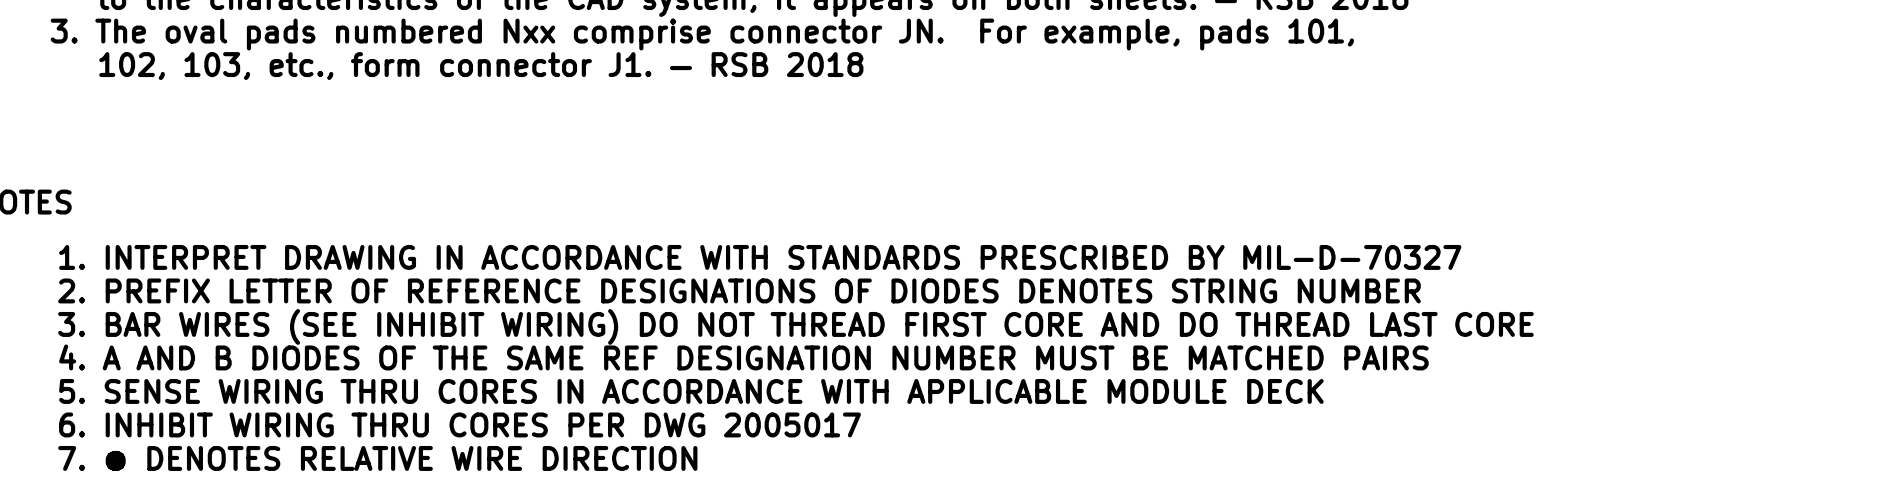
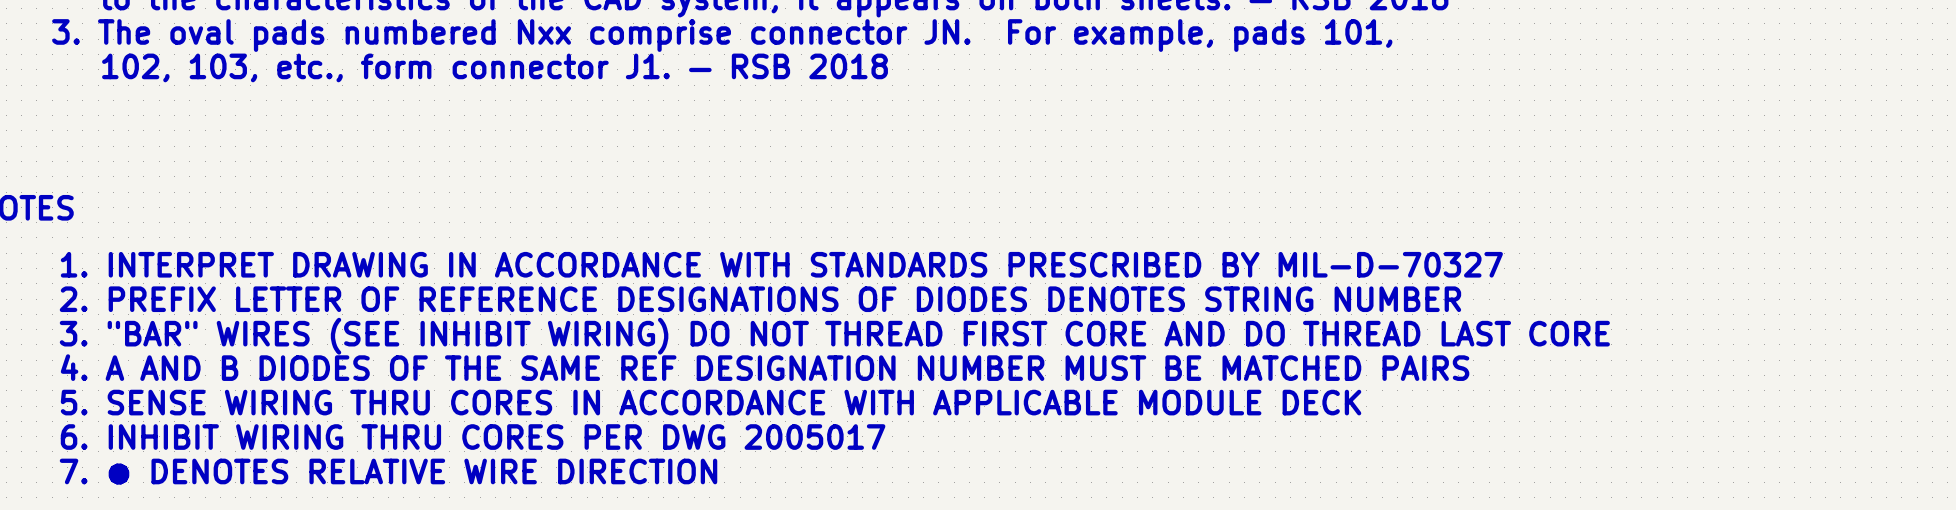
text: 3. BAR WIRES (SEE INHIBIT WIRING) DO NOT THREAD FIRST CORE AND DO THREAD LAST CORE (795, 326) -> 3. "BAR" WIRES (SEE INHIBIT WIRING) DO NOT THREAD FIRST CORE AND DO THREAD LAST CORE (834, 336)

